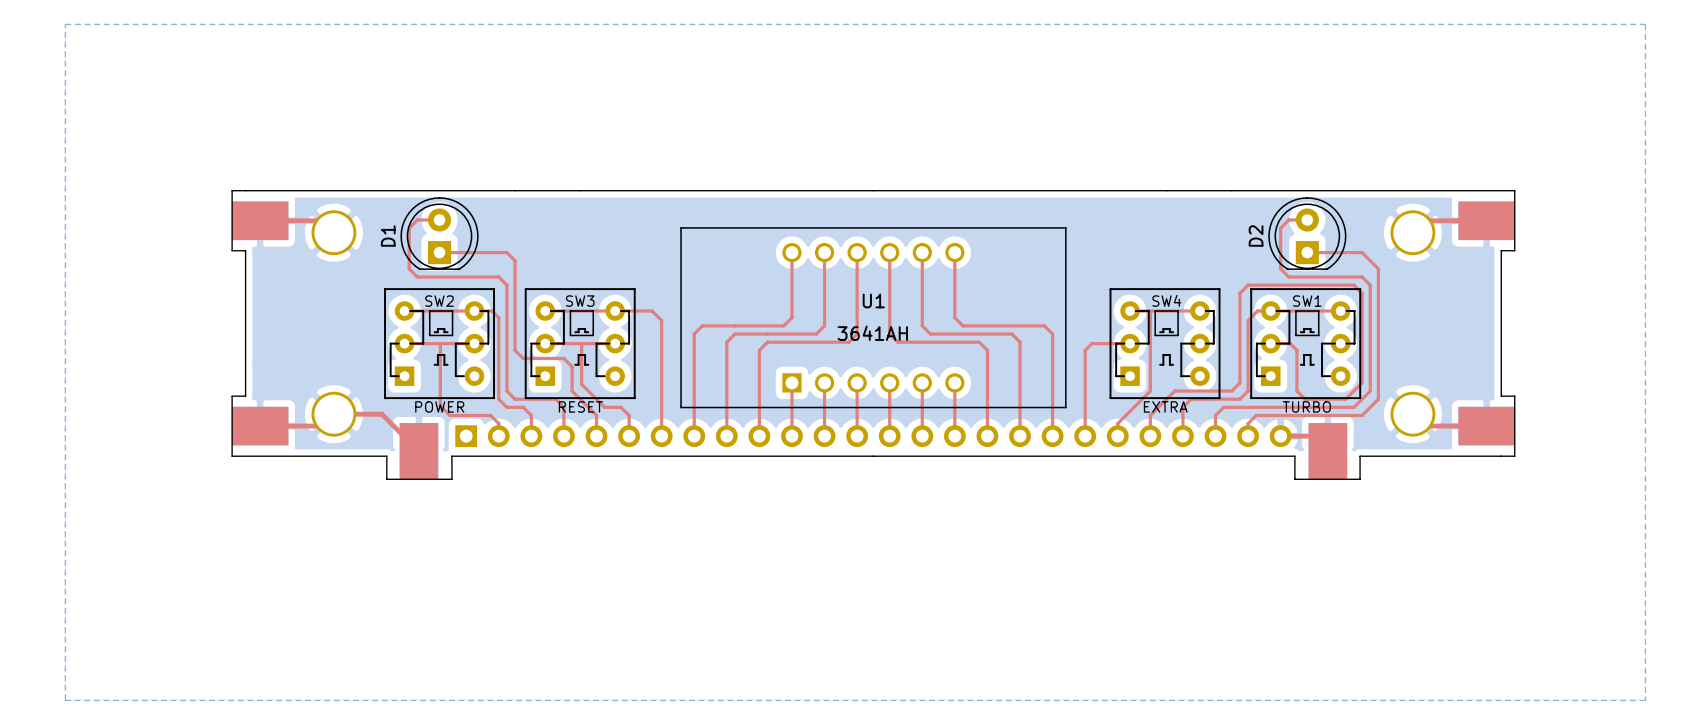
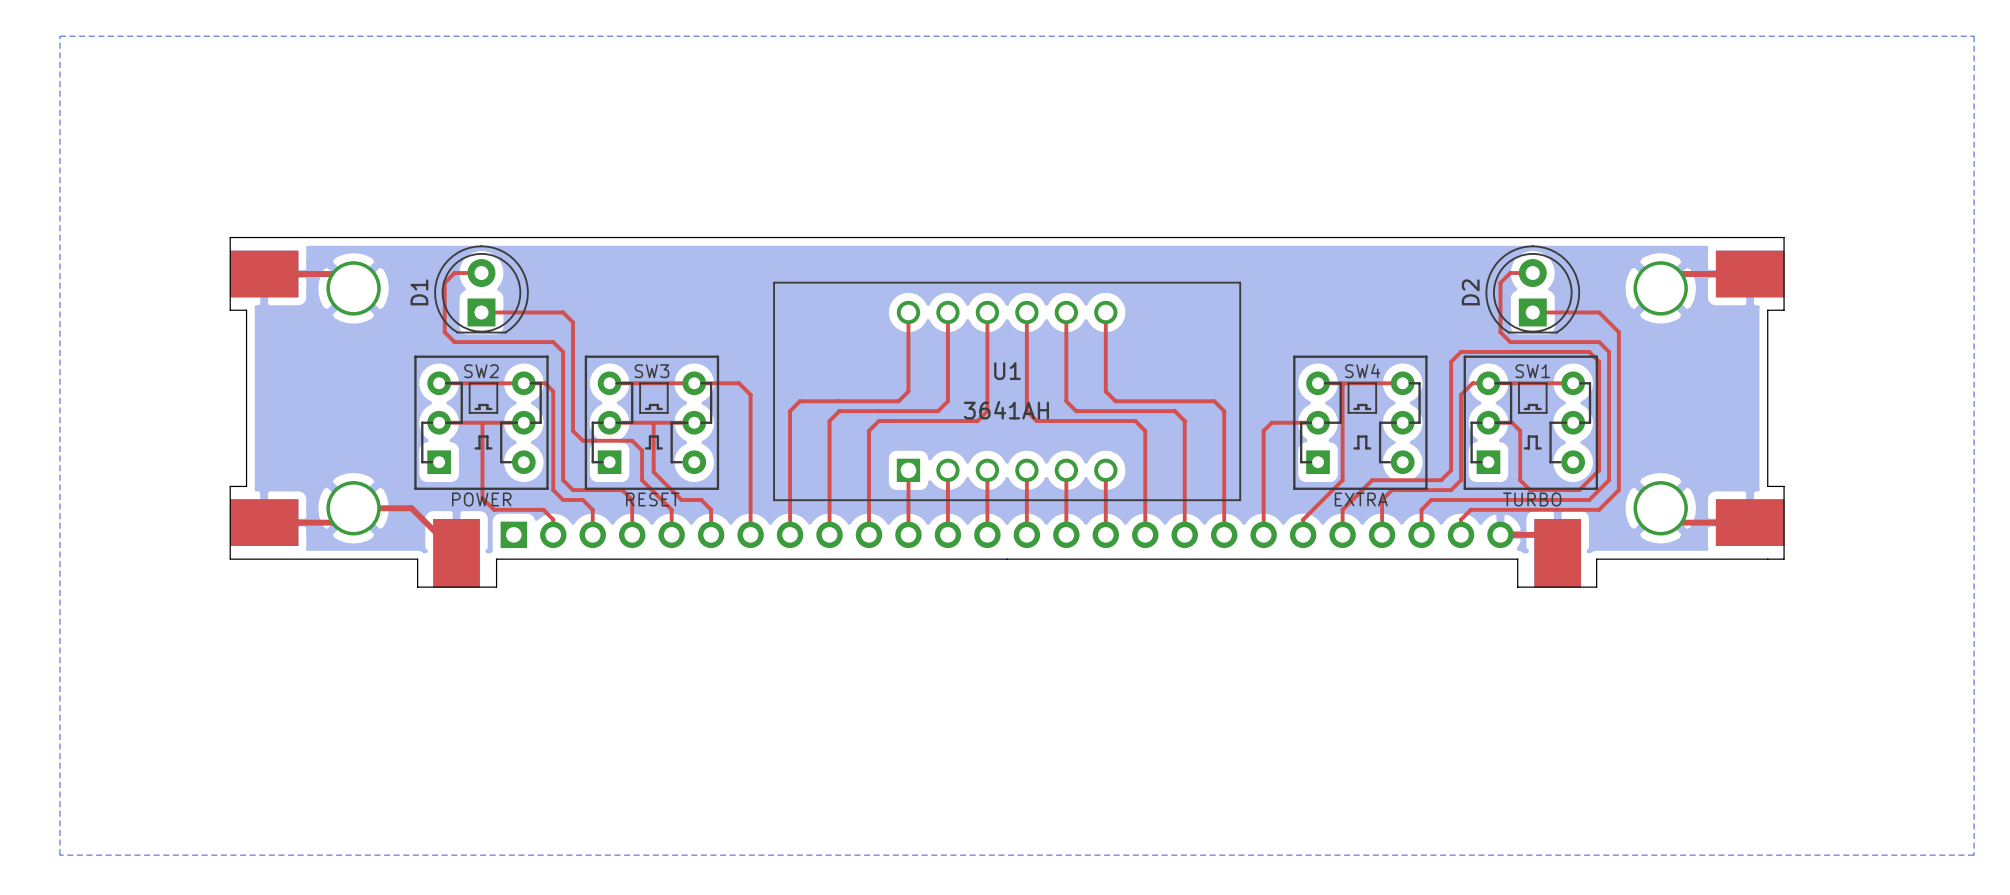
bottom zone outline: (65, 24) (65, 700) (1645, 700) (1645, 24) (65, 24) -> (59, 36) (59, 855) (1974, 855) (1974, 36) (59, 36)

